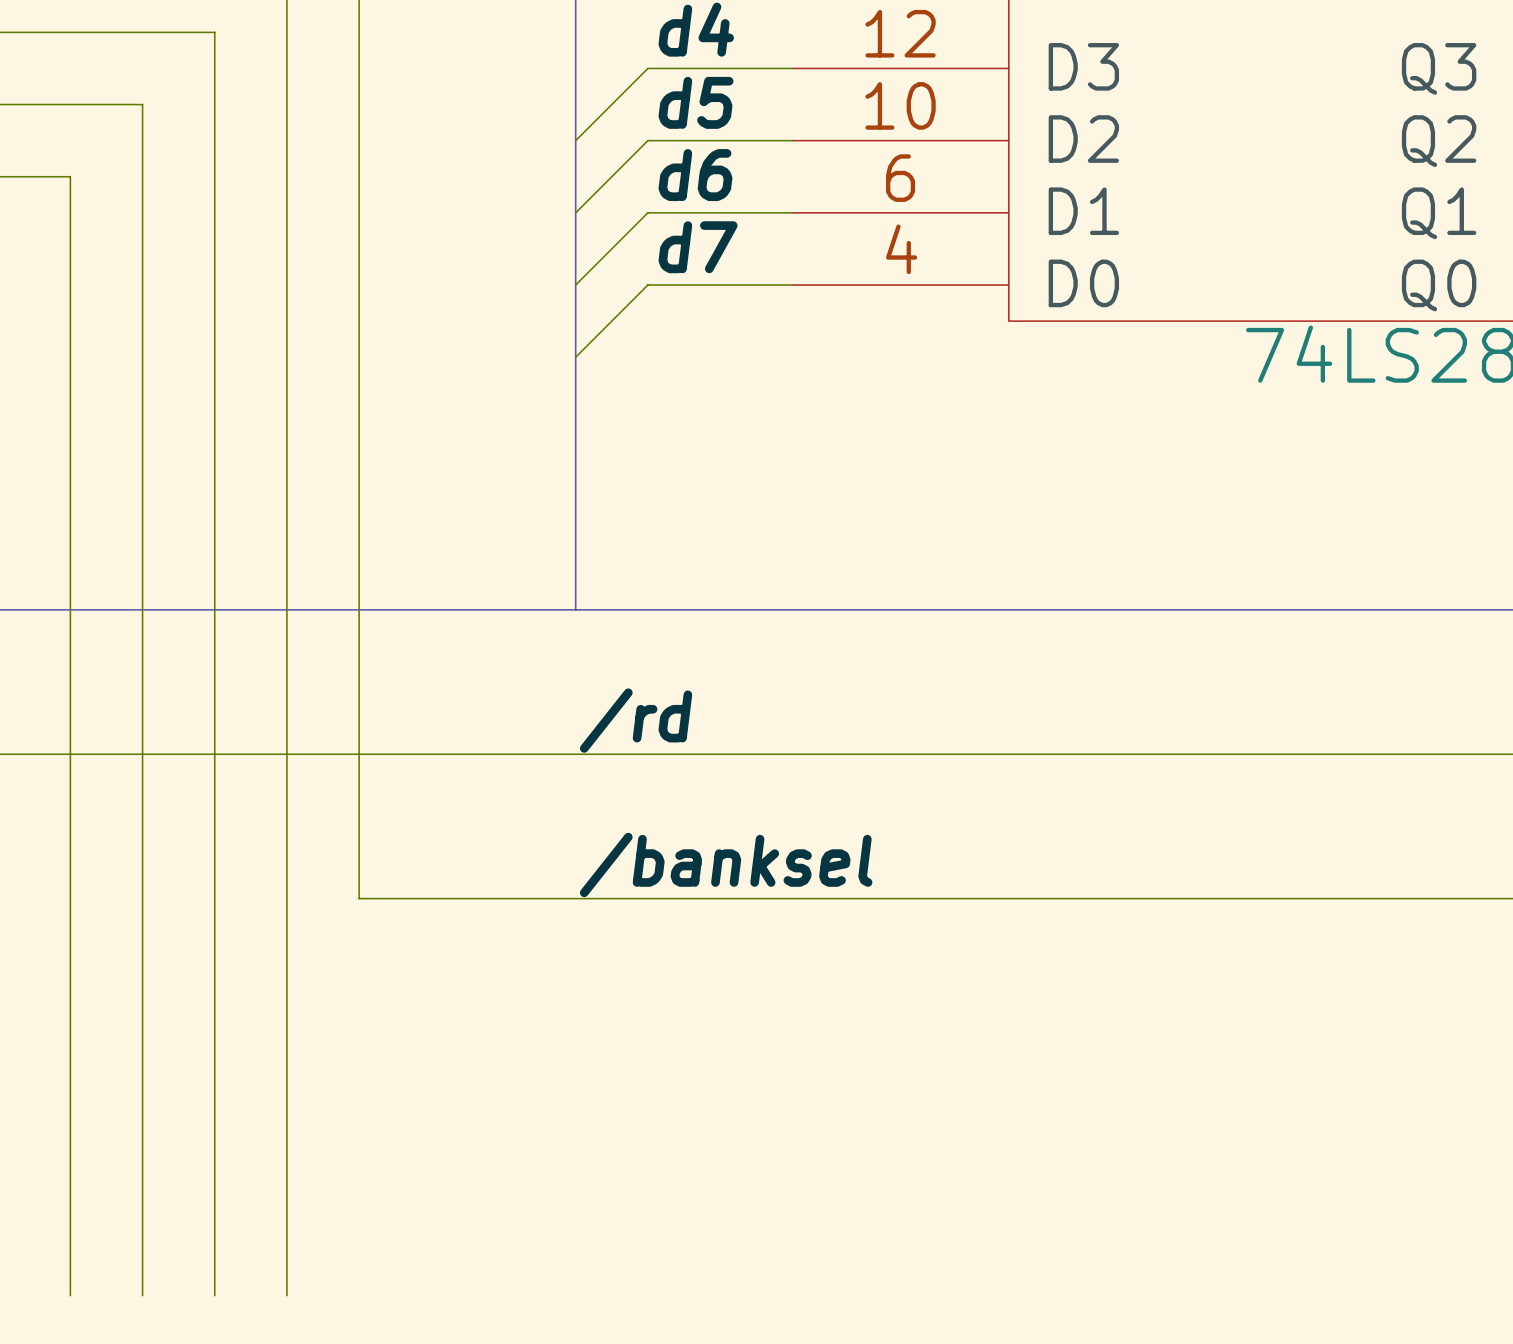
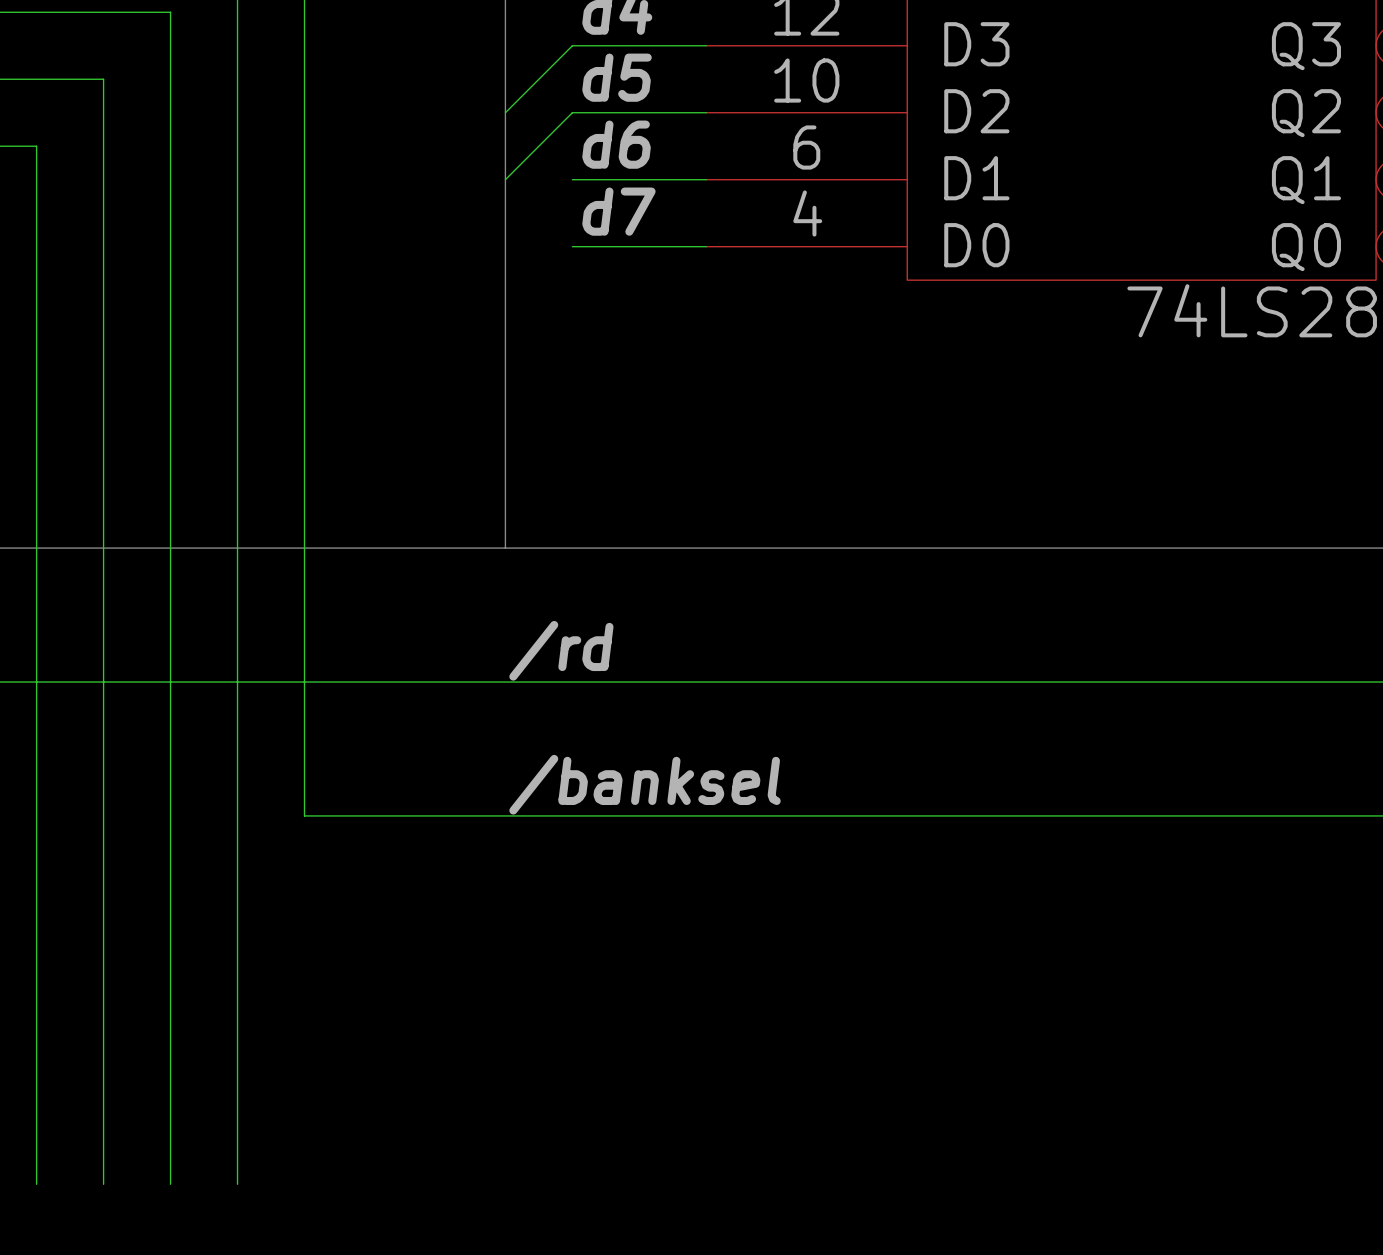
wire: (647, 212) (575, 285) -> none
wire: (647, 285) (575, 357) -> none

